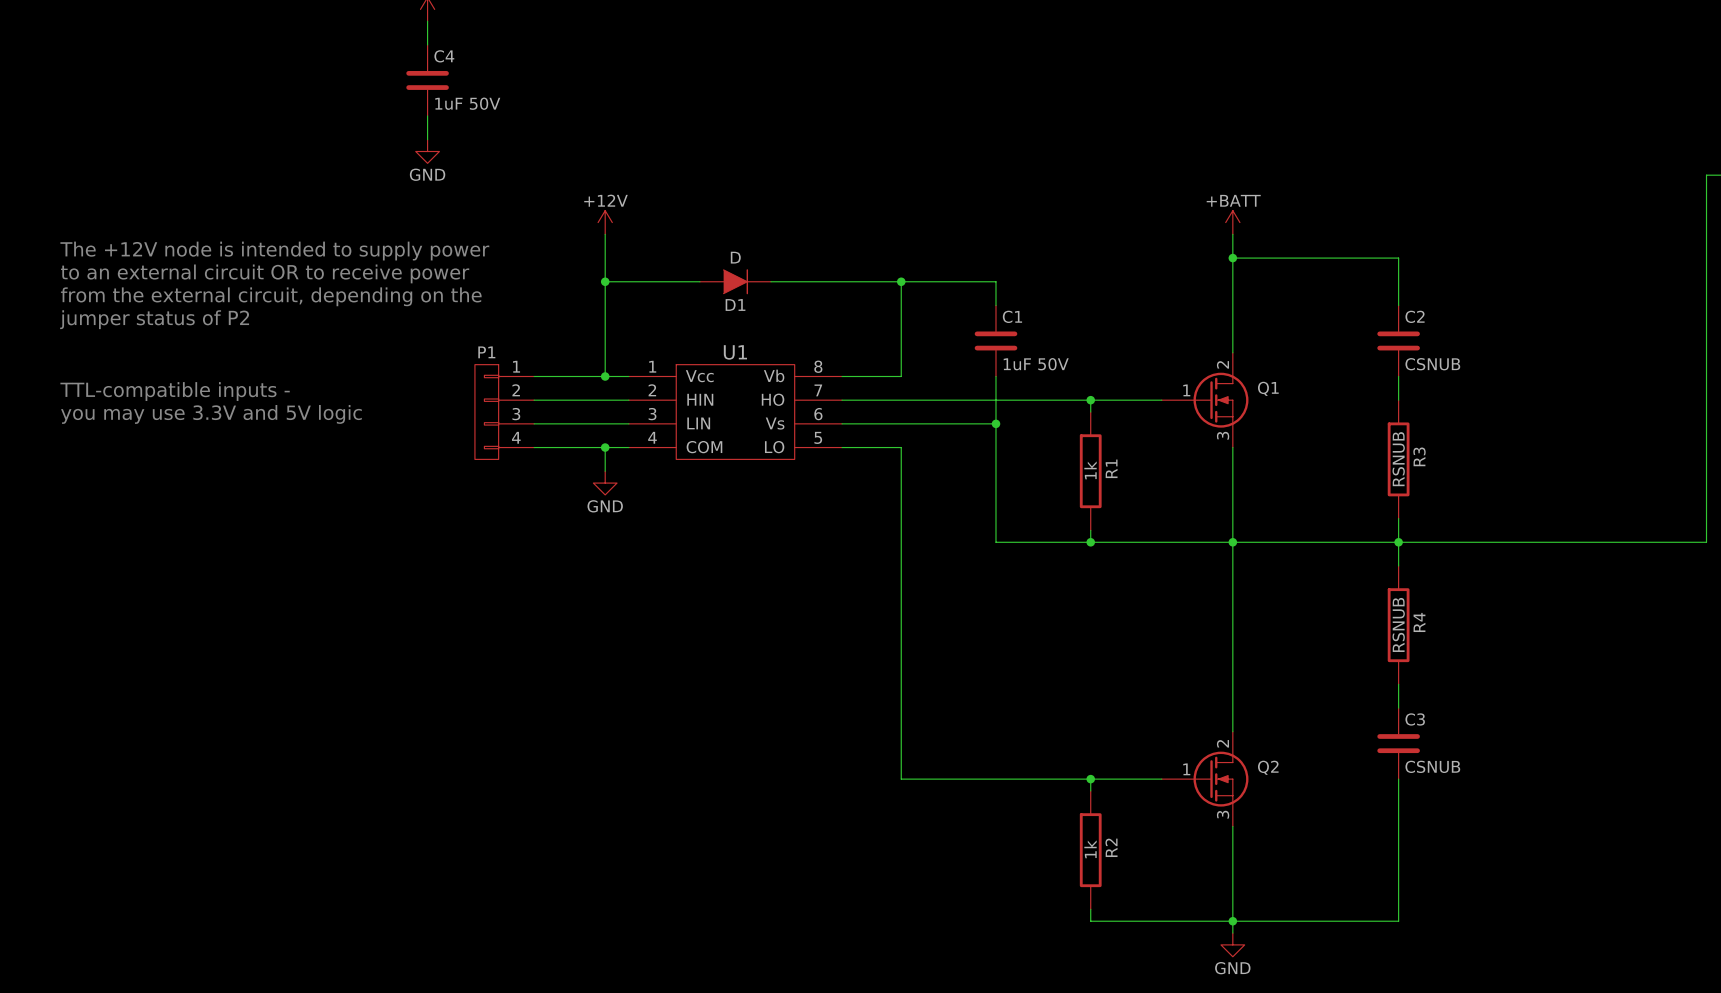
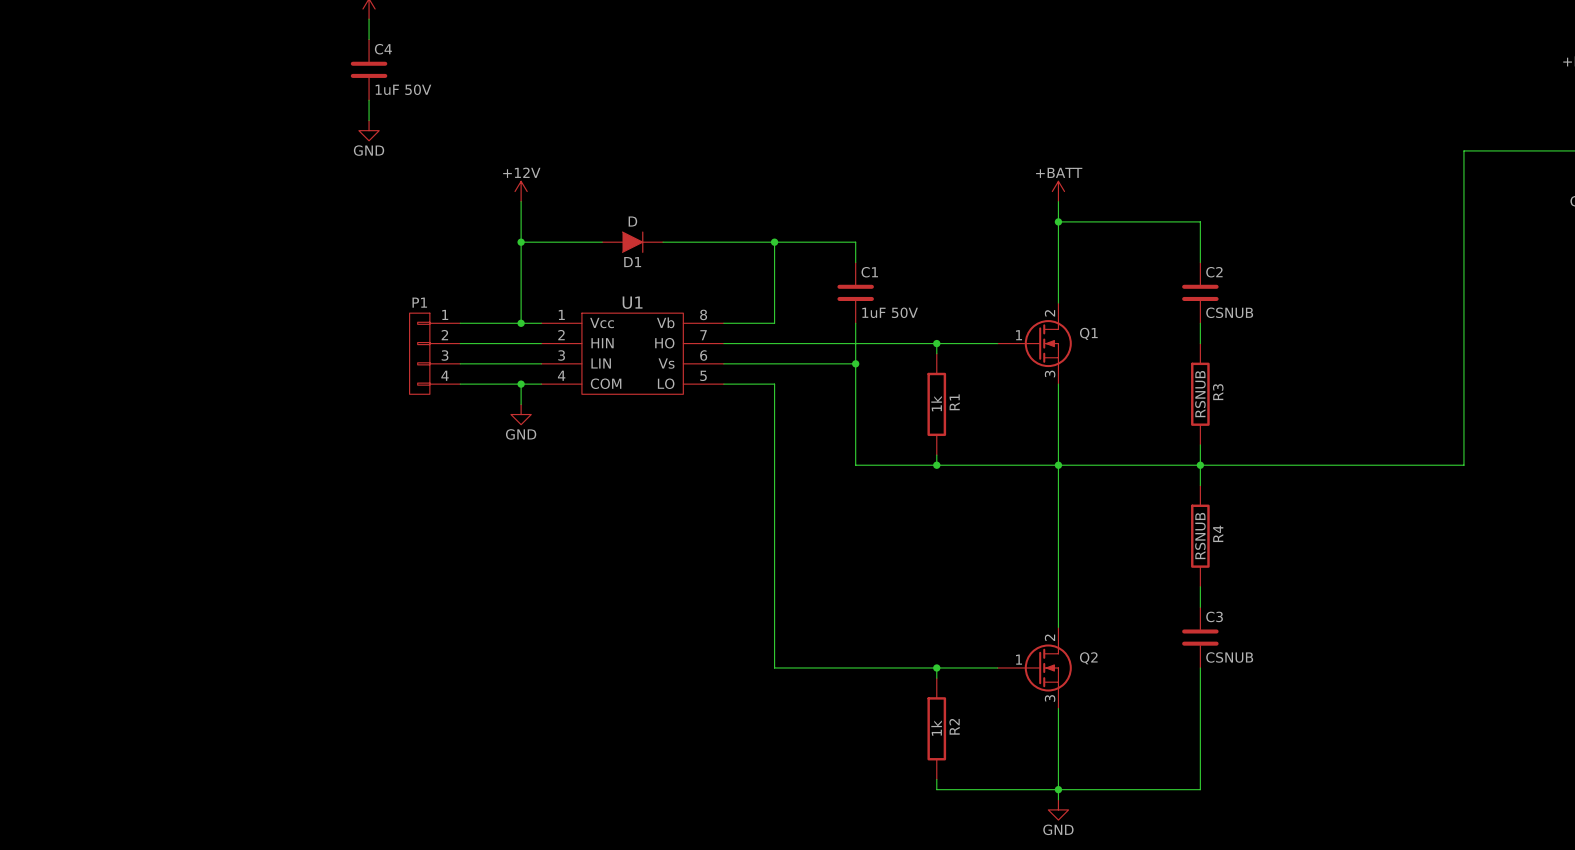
text: The +12V node is intended to supply power (274, 251) -> none
text: to an external circuit OR to receive power (265, 273) -> none
text: from the external circuit, depending on the (271, 296) -> none
text: jumper status of P2 (154, 319) -> none
text: TTL-compatible inputs - (175, 391) -> none
text: you may use 3.3V and 5V logic (211, 414) -> none

